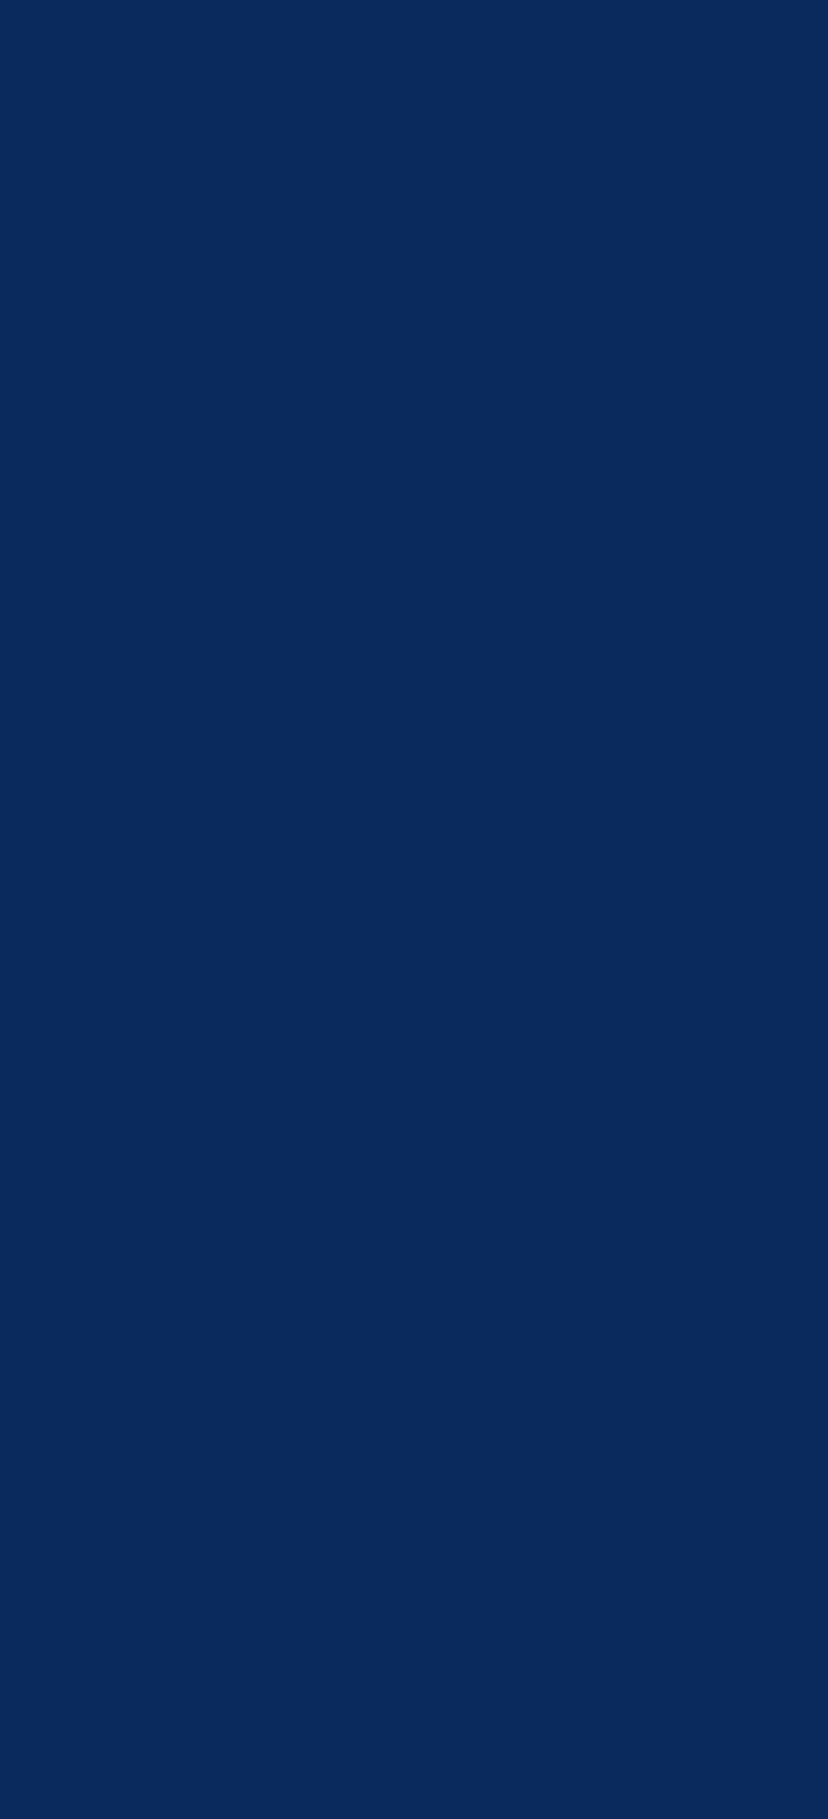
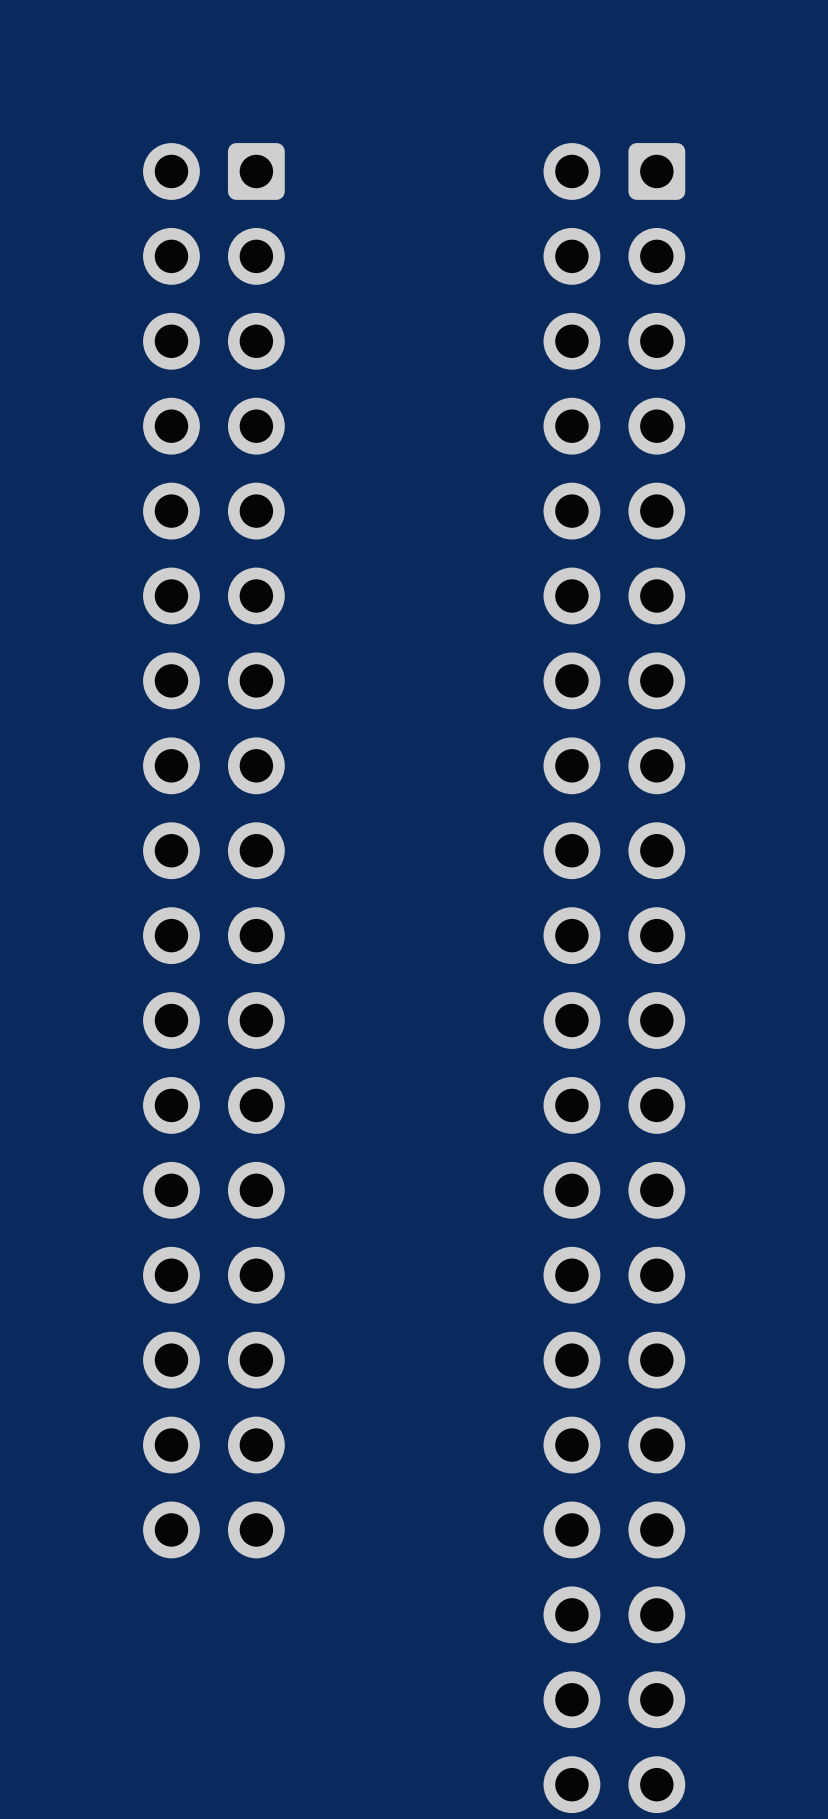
part: none -> (213, 850)
part: none -> (614, 978)

